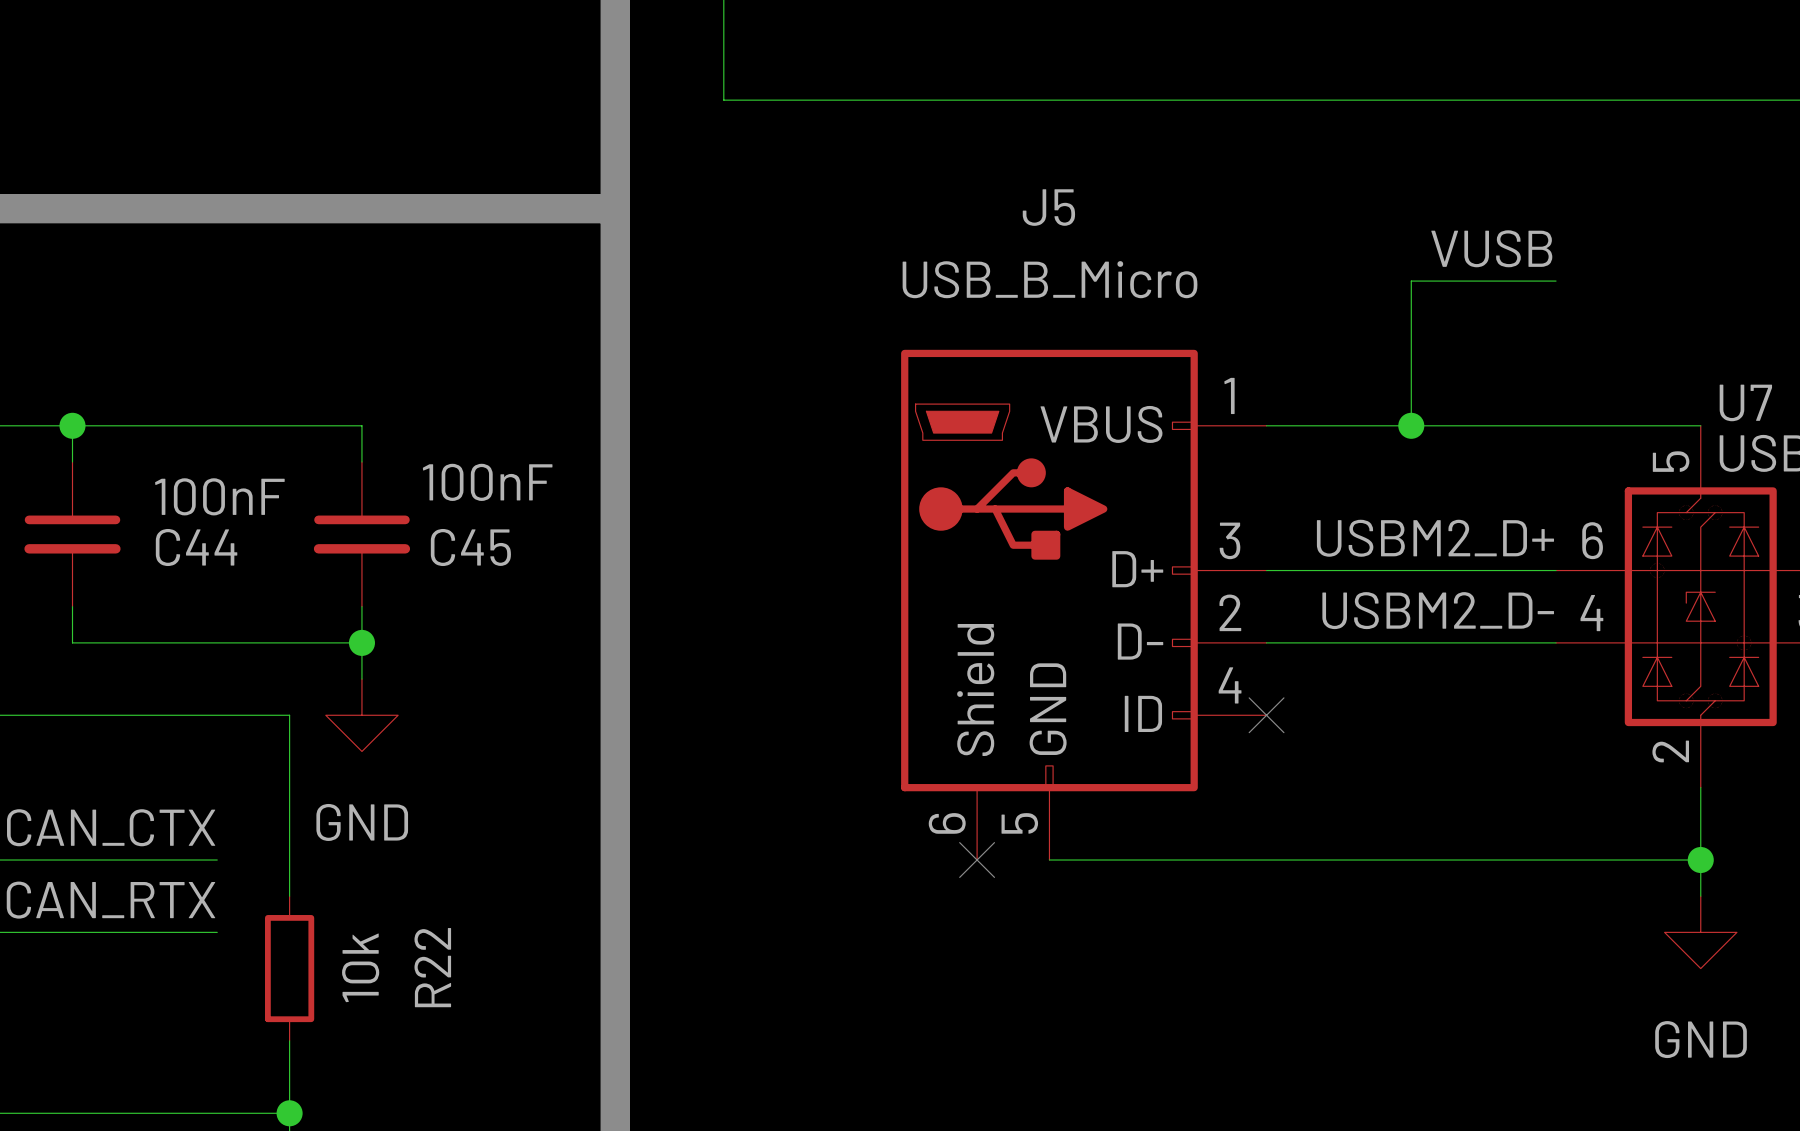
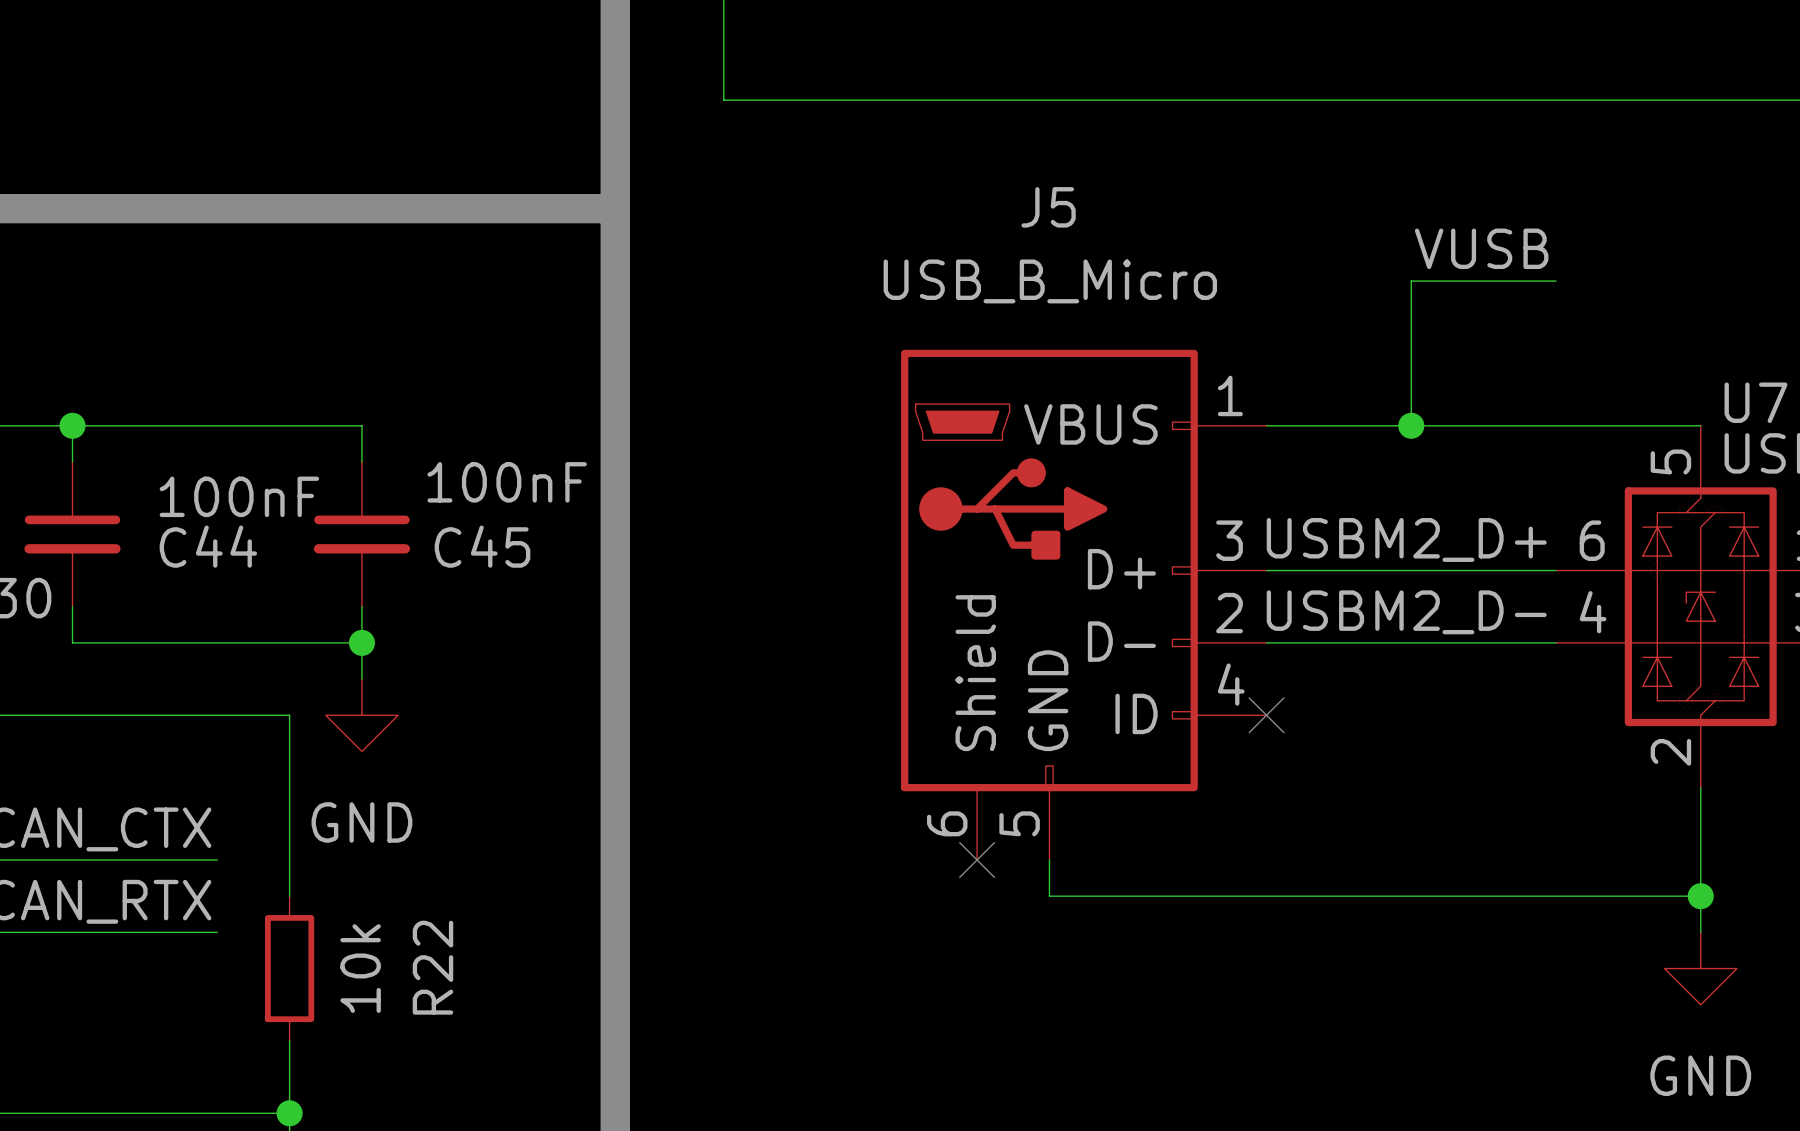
wire: (1049, 860) (1700, 860) -> (1049, 860) (1049, 896) (1700, 896) (1700, 932)
junction position: (1700, 860) -> (1700, 896)
power symbol position: GND (1700, 932) -> GND (1700, 968)

